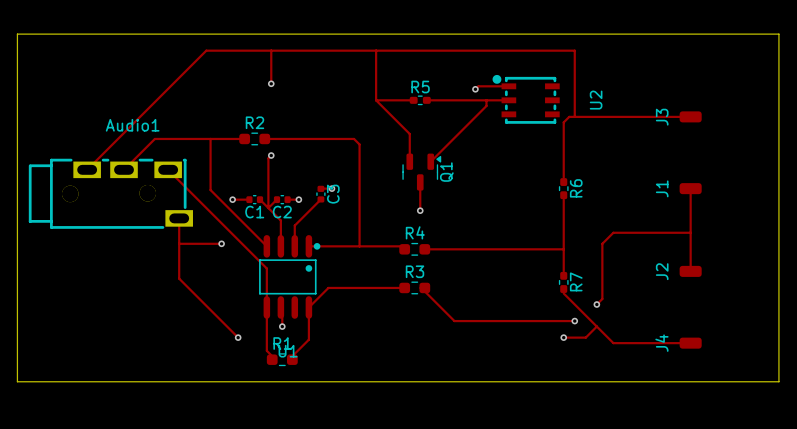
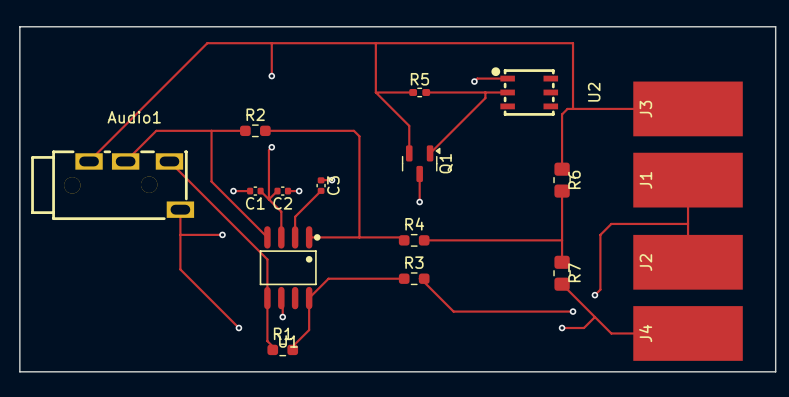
J3 footprint: [679, 111, 702, 123] -> [633, 81, 743, 137]
R6 footprint: [558, 178, 569, 200] -> [553, 162, 571, 198]
J1 footprint: [679, 183, 702, 195] -> [633, 152, 743, 208]
J2 footprint: [679, 265, 702, 277] -> [633, 234, 743, 290]
R7 footprint: [558, 271, 569, 293] -> [553, 255, 571, 291]
J4 footprint: [679, 337, 702, 349] -> [633, 306, 743, 361]

